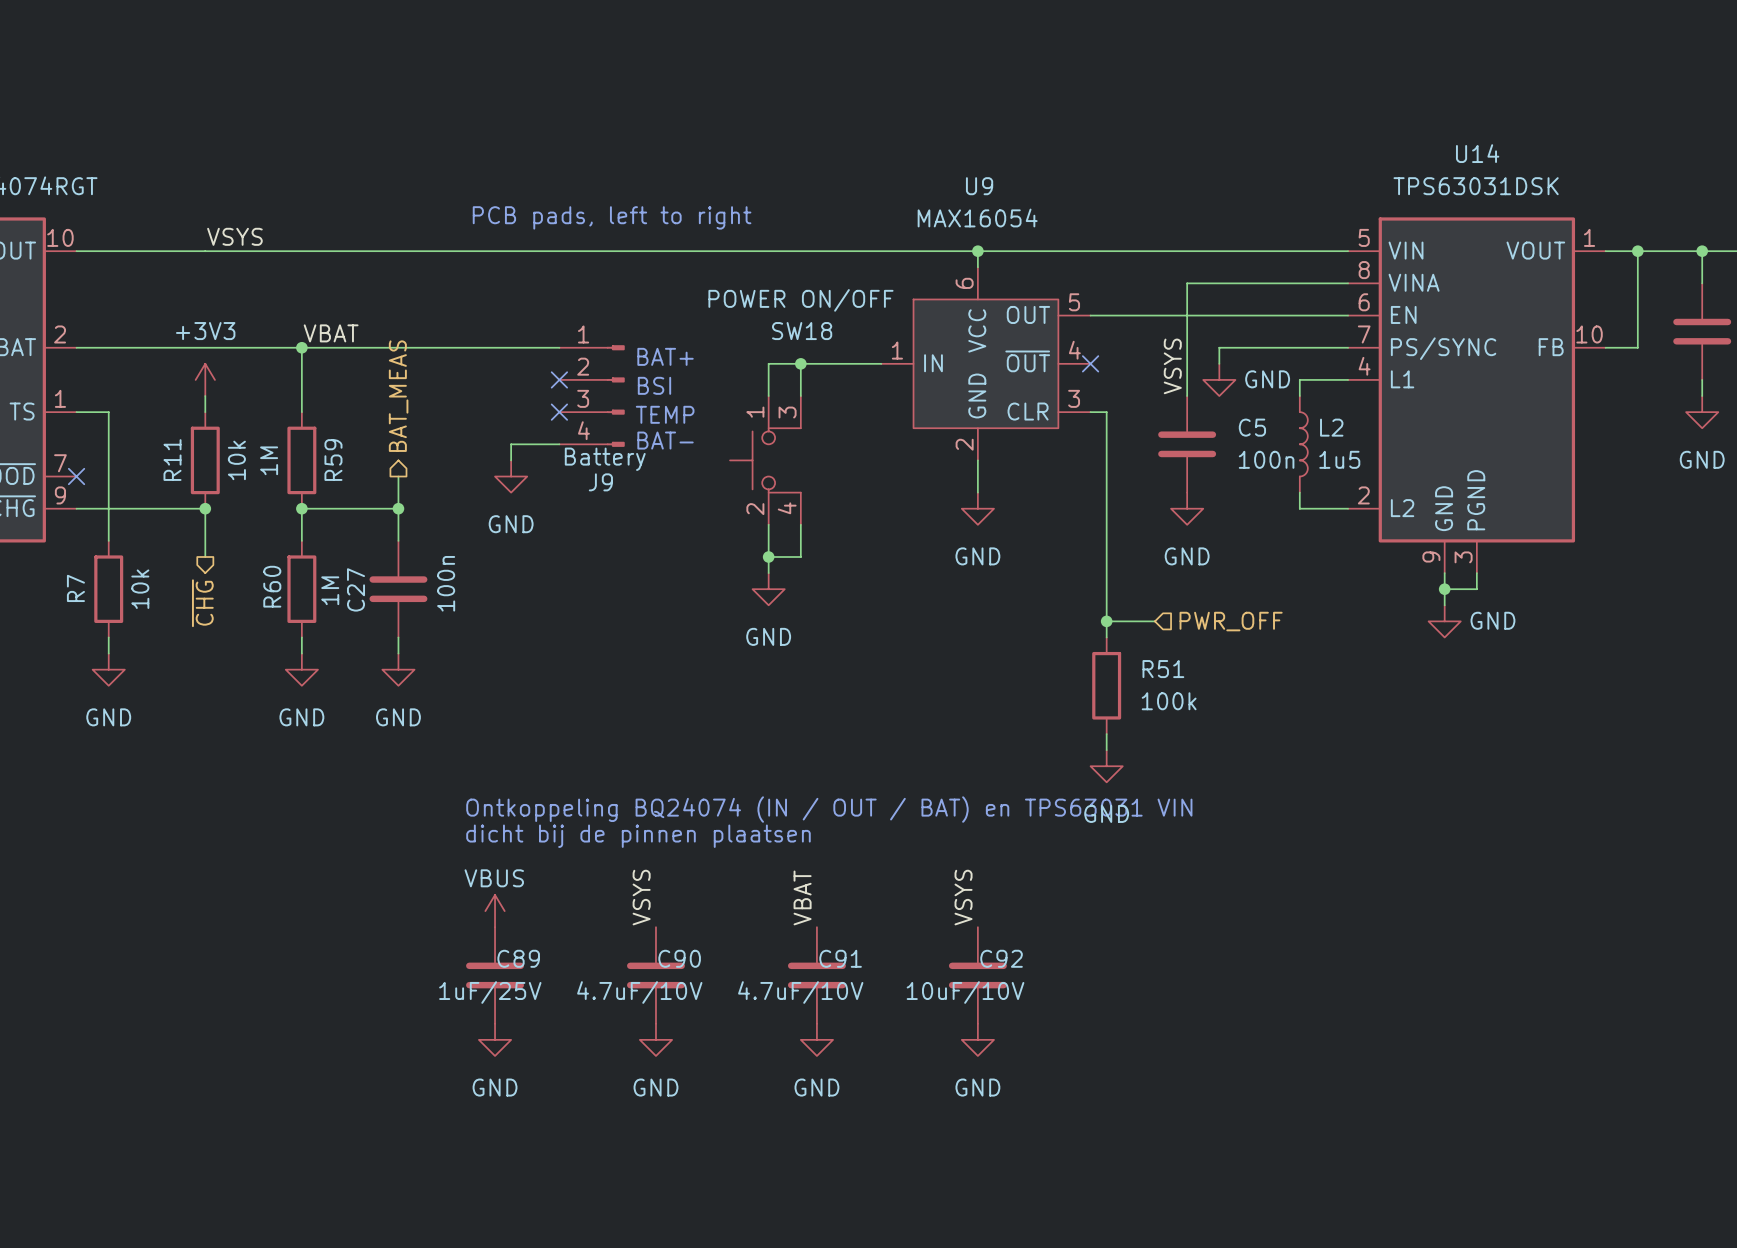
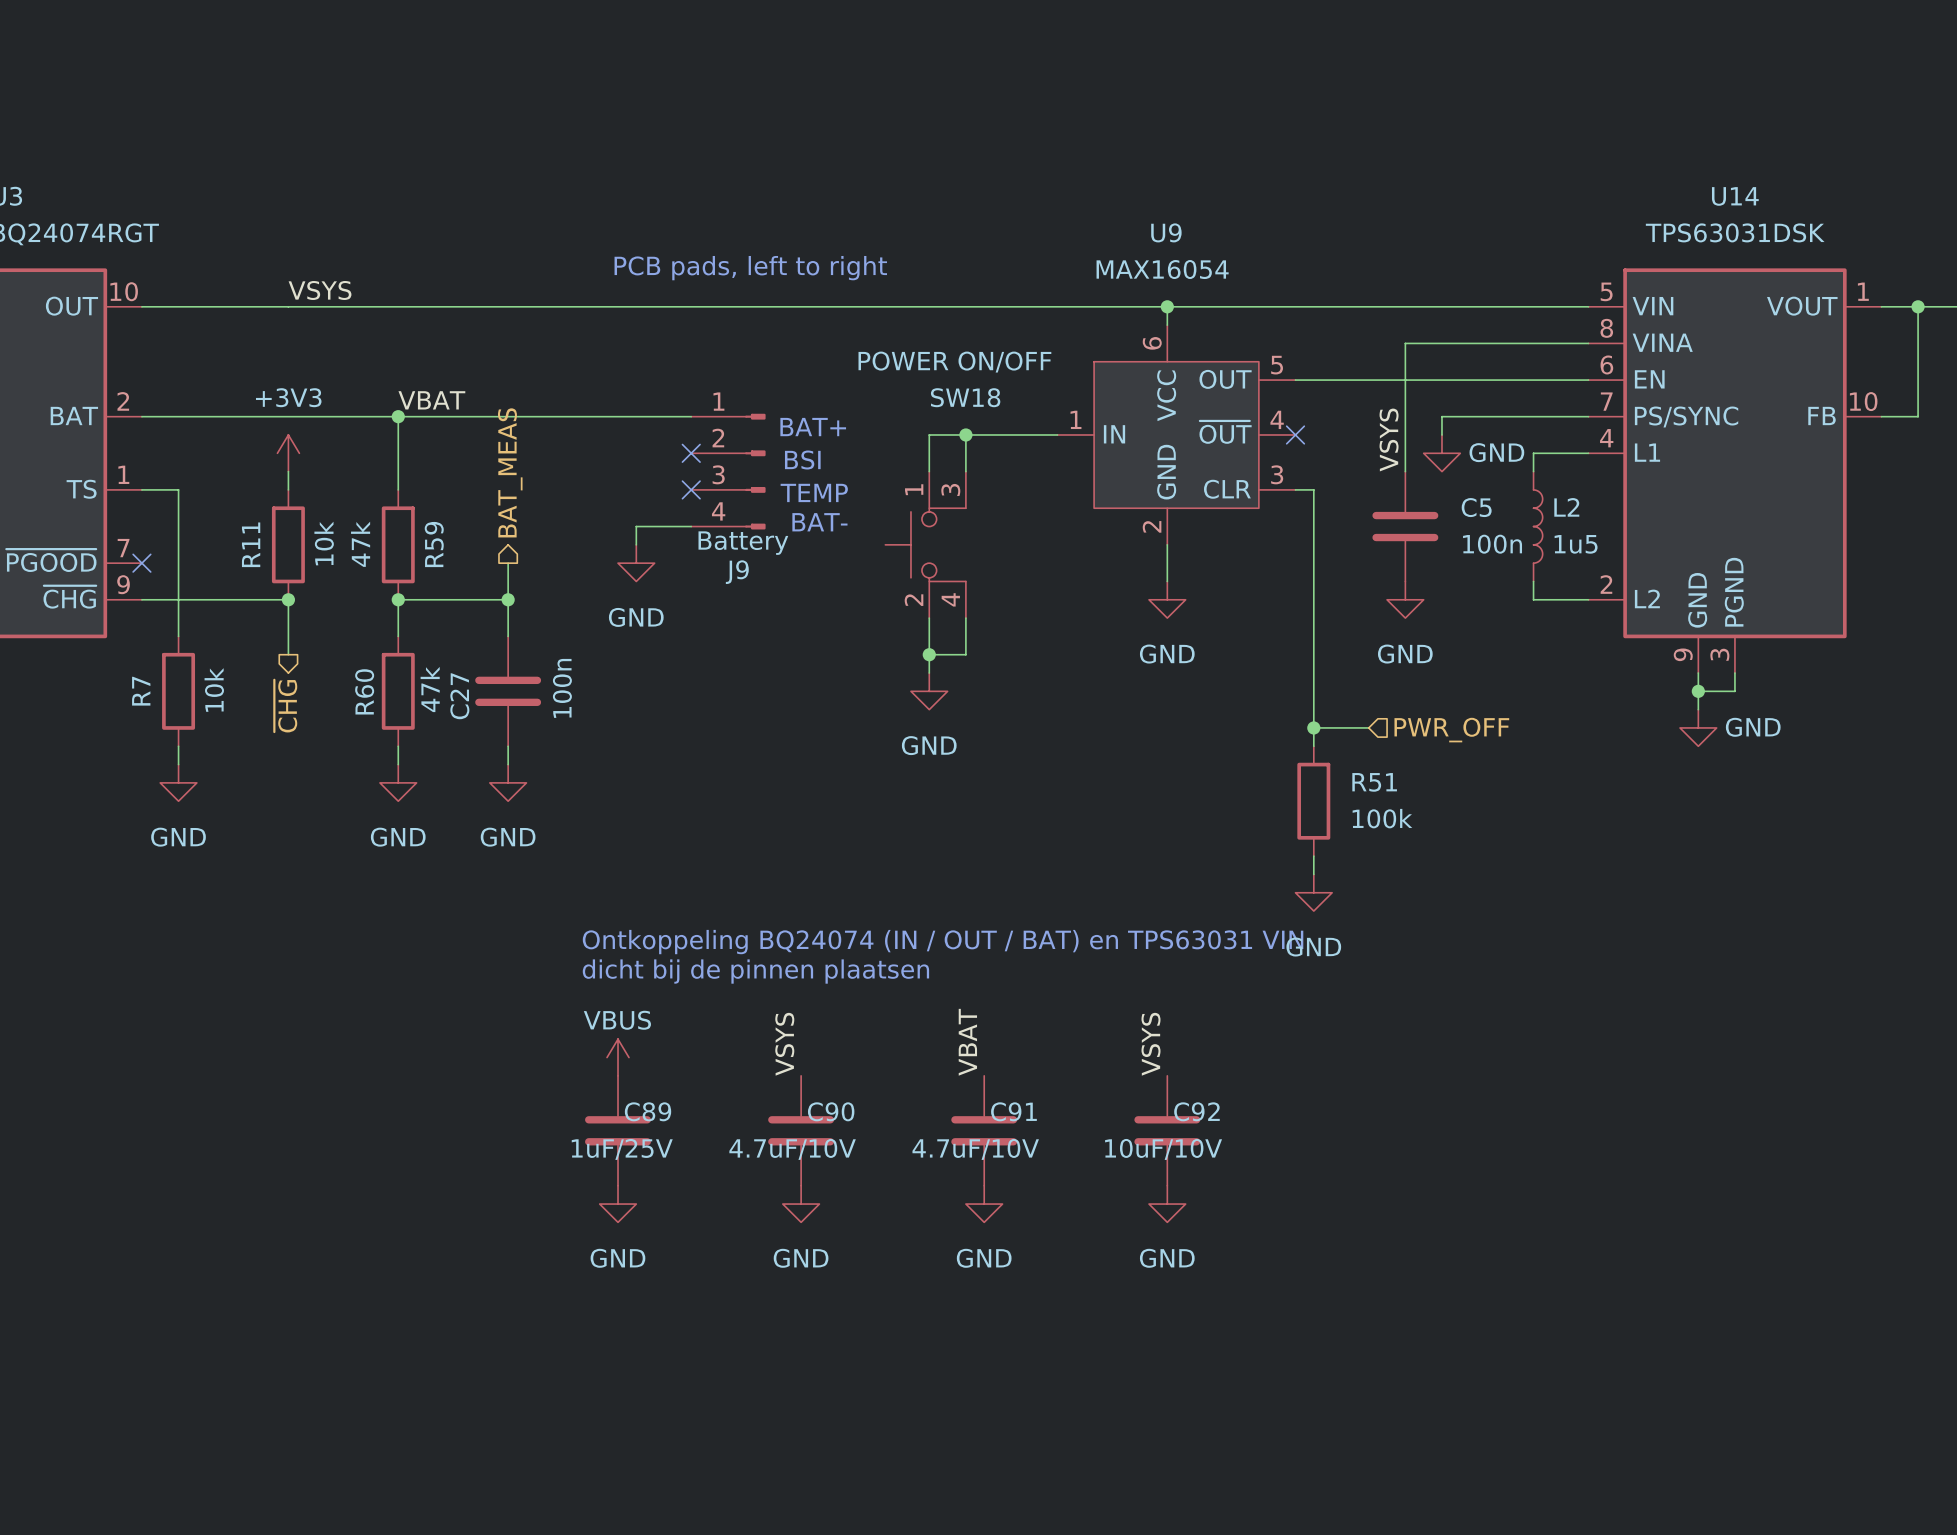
R59 value: 1M (269, 460) -> 47k (360, 544)
R60 value: 1M (330, 590) -> 47k (430, 689)

